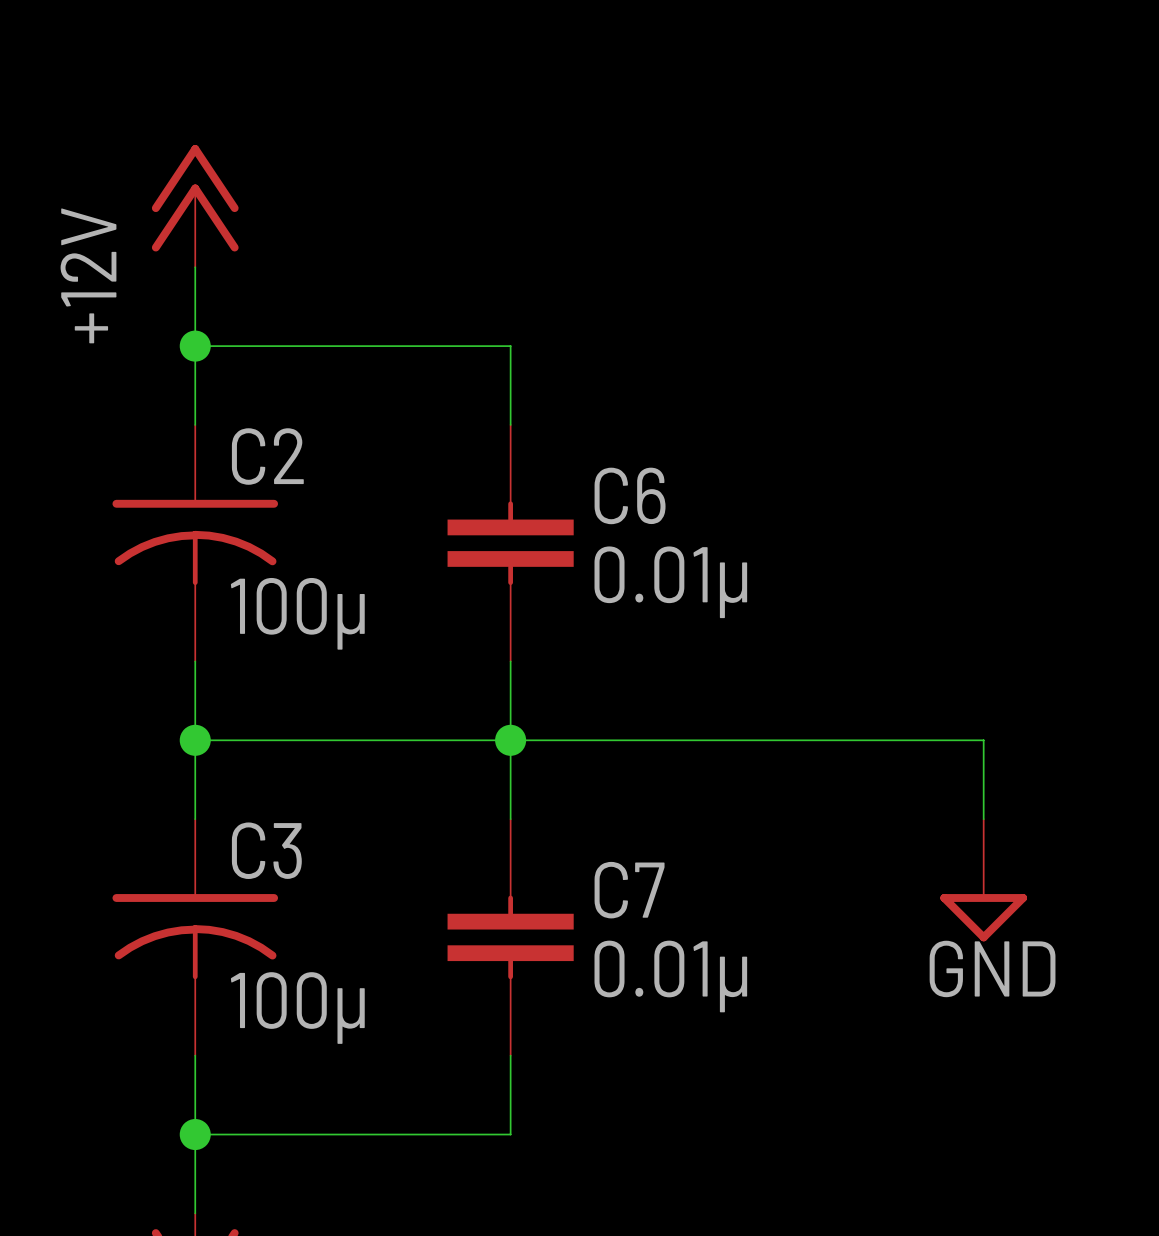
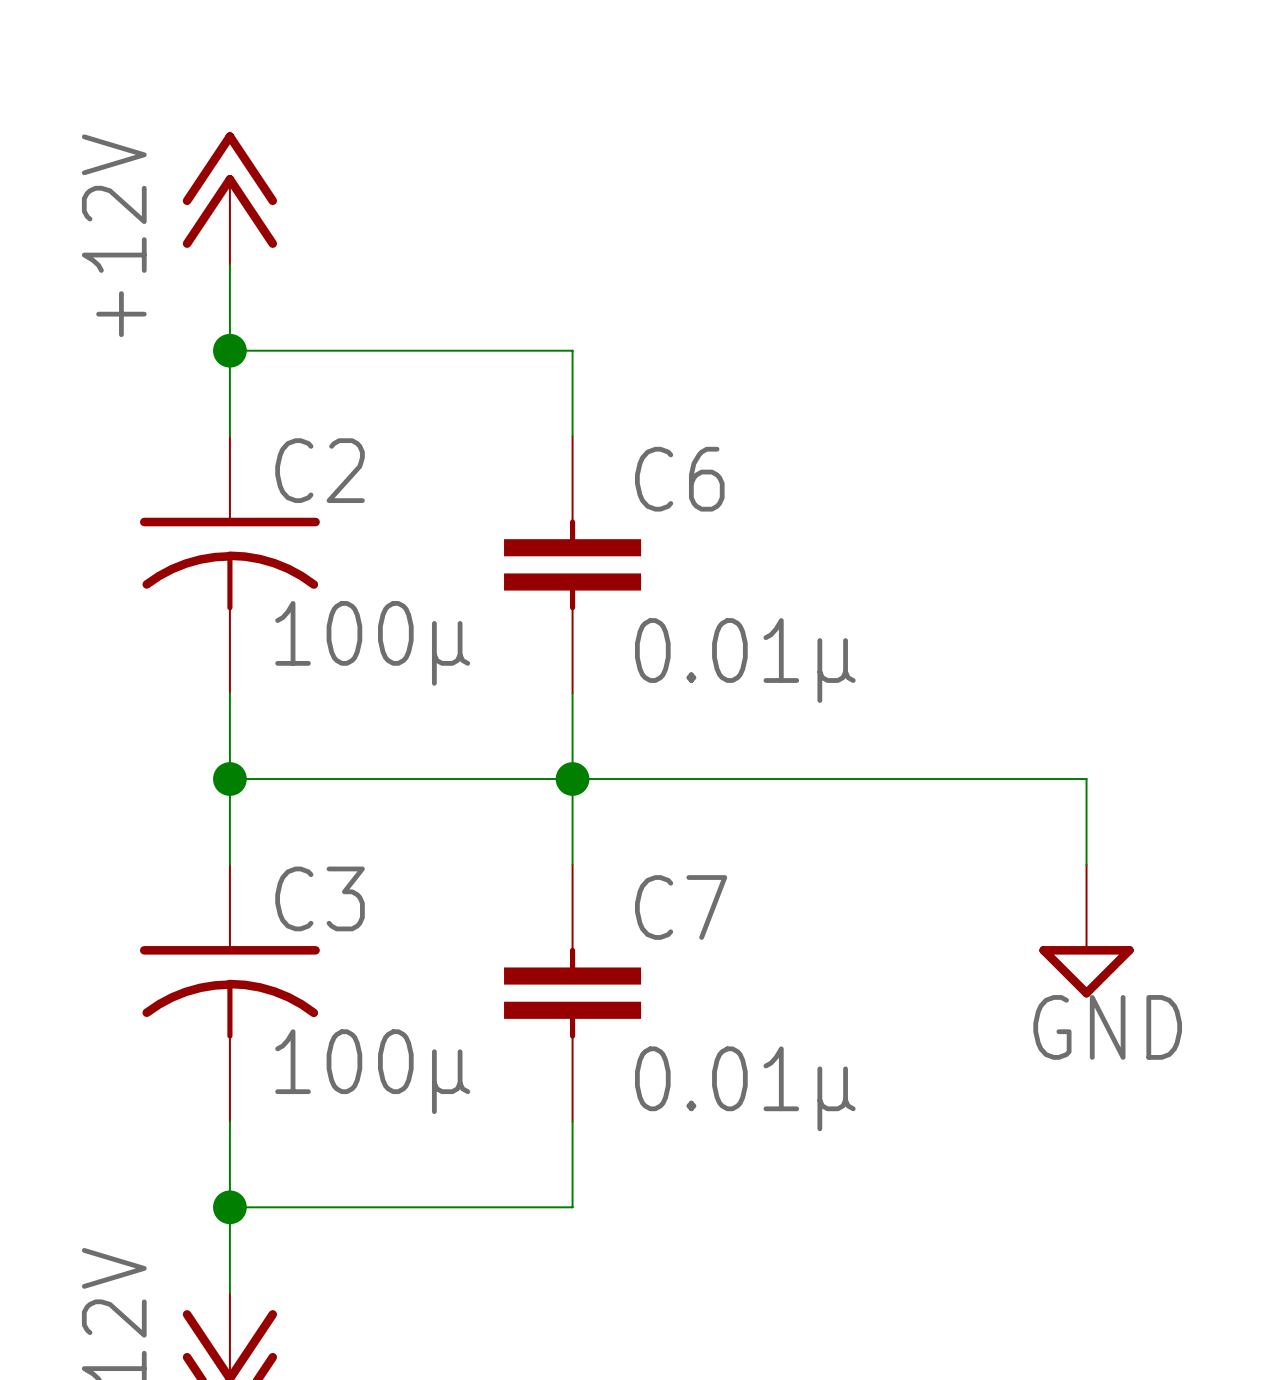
C6 name position: C6 (630, 495) -> C6 (679, 479)
C6 value position: 0.01µ (670, 582) -> 0.01µ (745, 660)
C7 name position: C7 (629, 890) -> C7 (681, 907)
C7 value position: 0.01µ (670, 976) -> 0.01µ (745, 1088)

